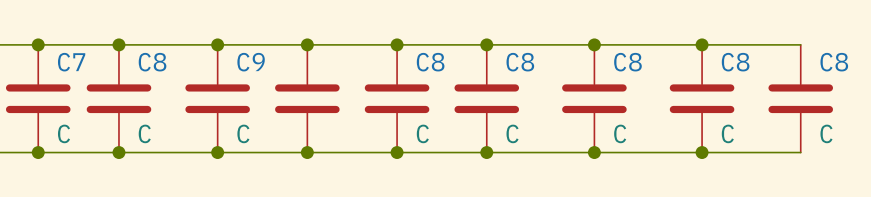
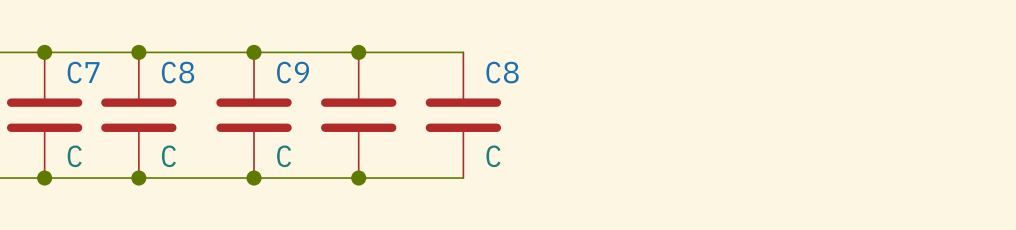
wire: (397, 44) (800, 44) -> none
junction: (397, 44) -> none
junction: (486, 44) -> none
junction: (594, 44) -> none
junction: (702, 44) -> none
C8: C (486, 98) -> none
C8: C (594, 98) -> none
C8: C (702, 98) -> none
C8: C (800, 98) -> none
wire: (397, 152) (800, 152) -> none
junction: (397, 152) -> none
junction: (486, 152) -> none
junction: (594, 152) -> none
junction: (702, 152) -> none

